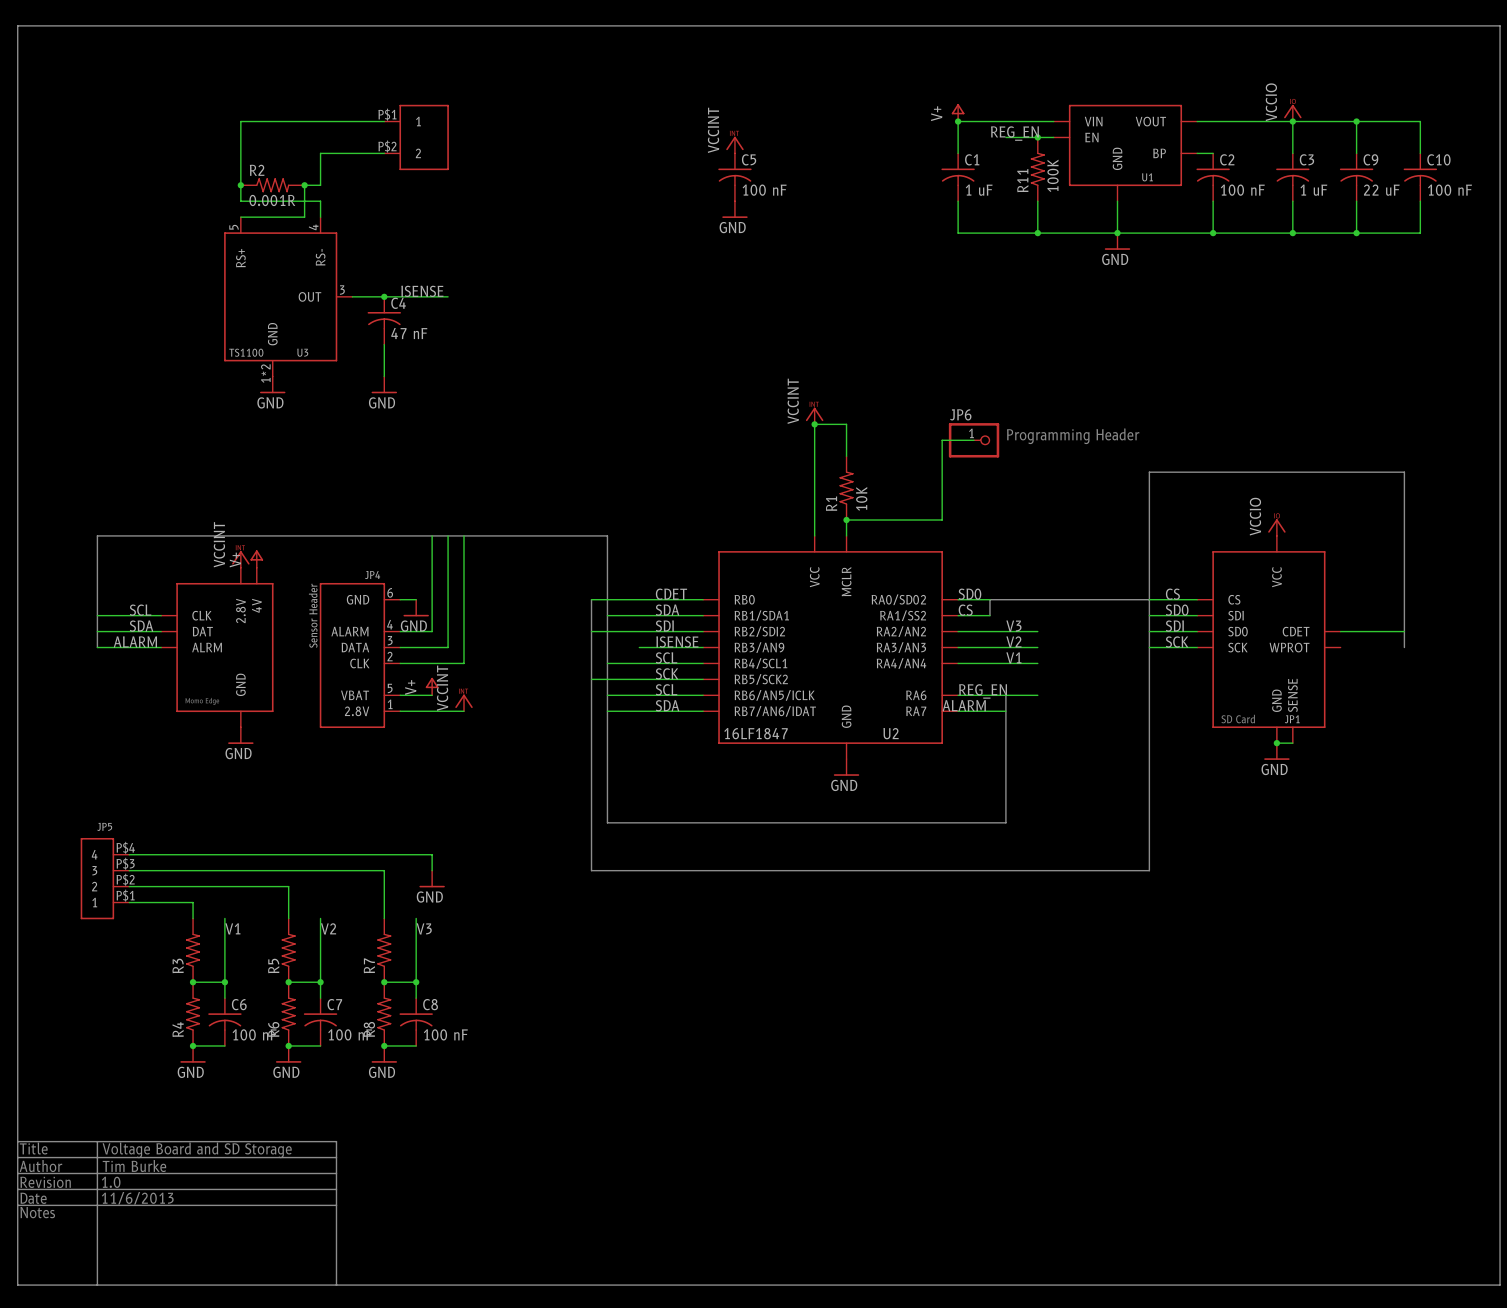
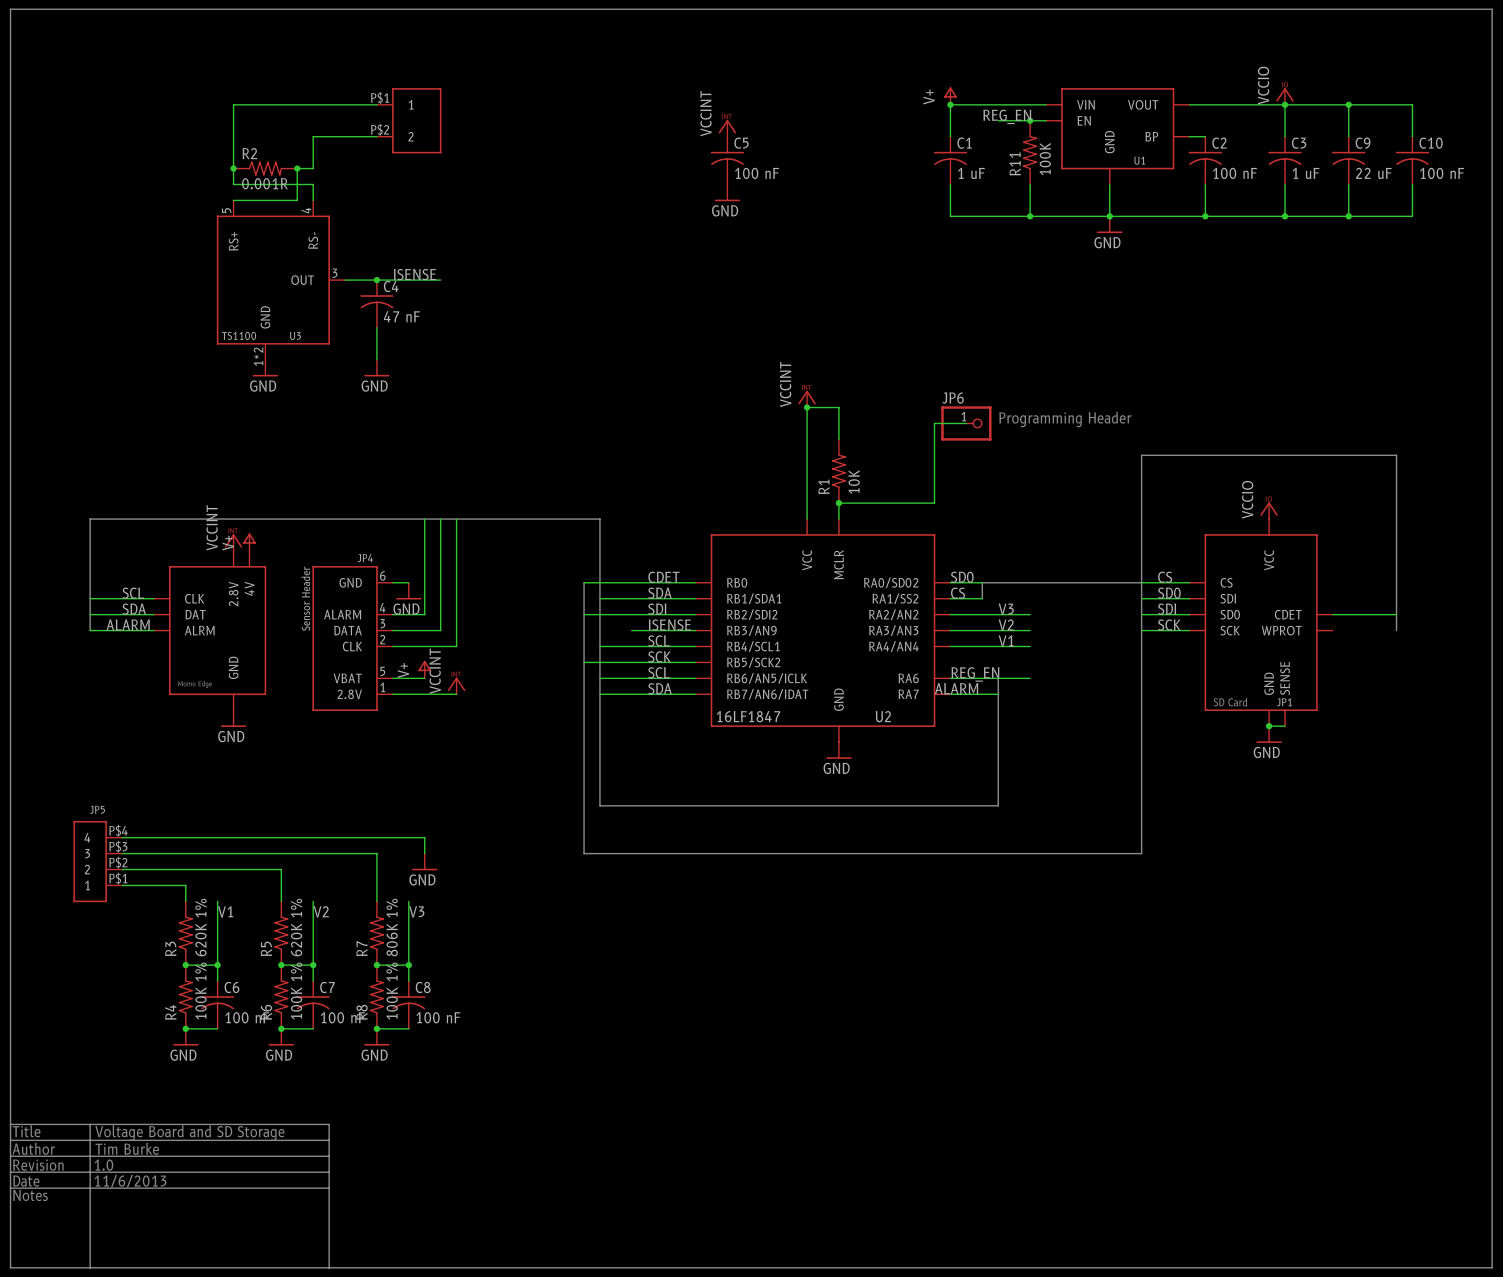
R3 value: none -> 620K 1% (200, 927)
R5 value: none -> 620K 1% (296, 927)
R7 value: none -> 806K 1% (392, 927)
R4 value: none -> 100K 1% (200, 991)
R6 value: none -> 100K 1% (296, 991)
R8 value: none -> 100K 1% (392, 991)

